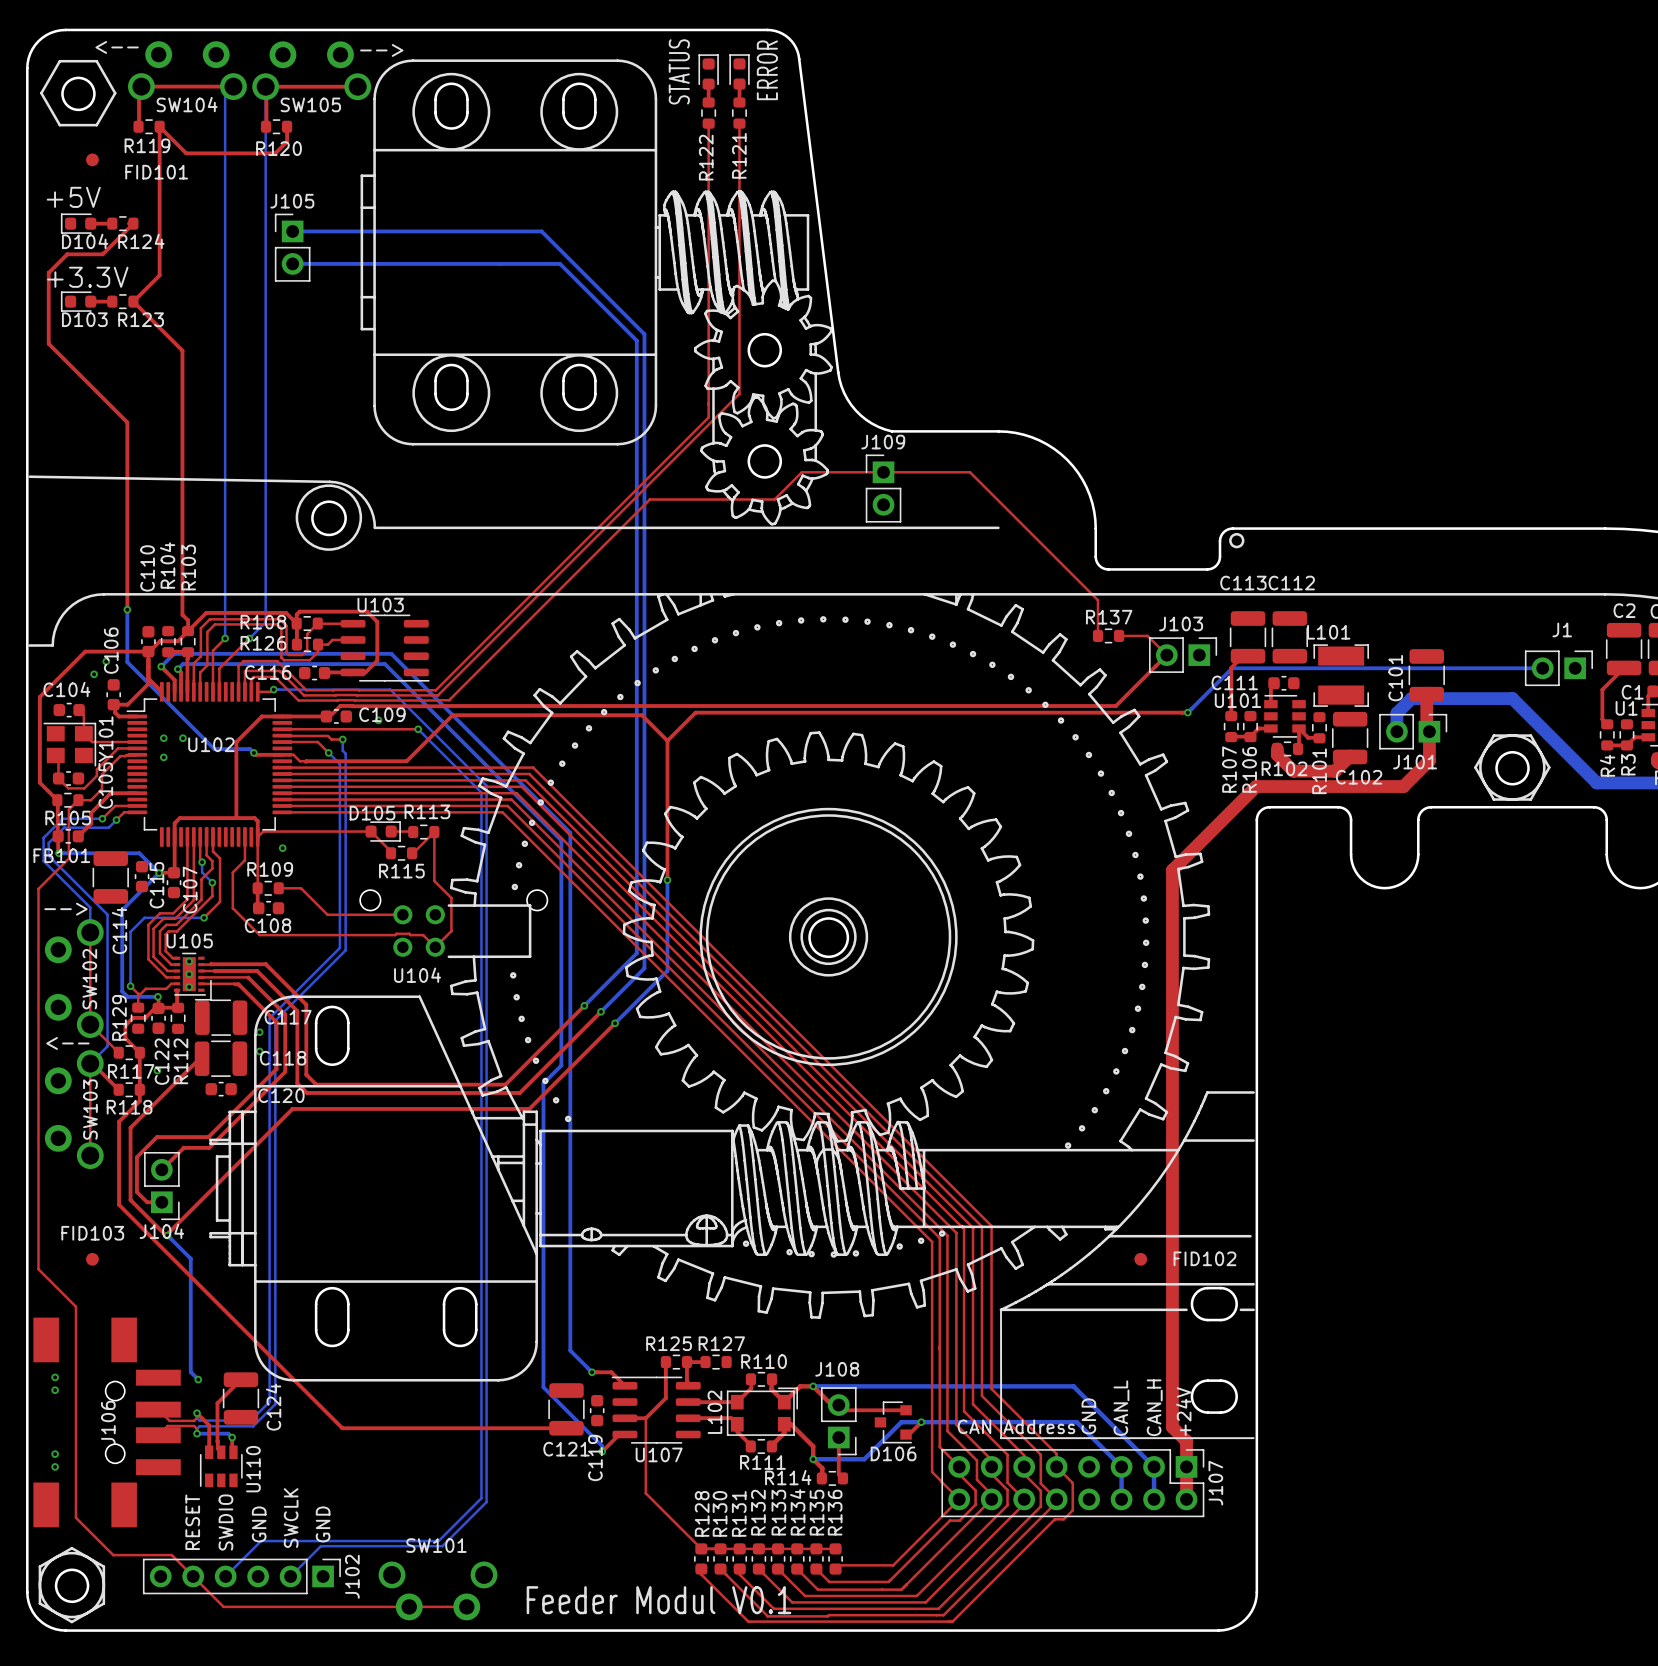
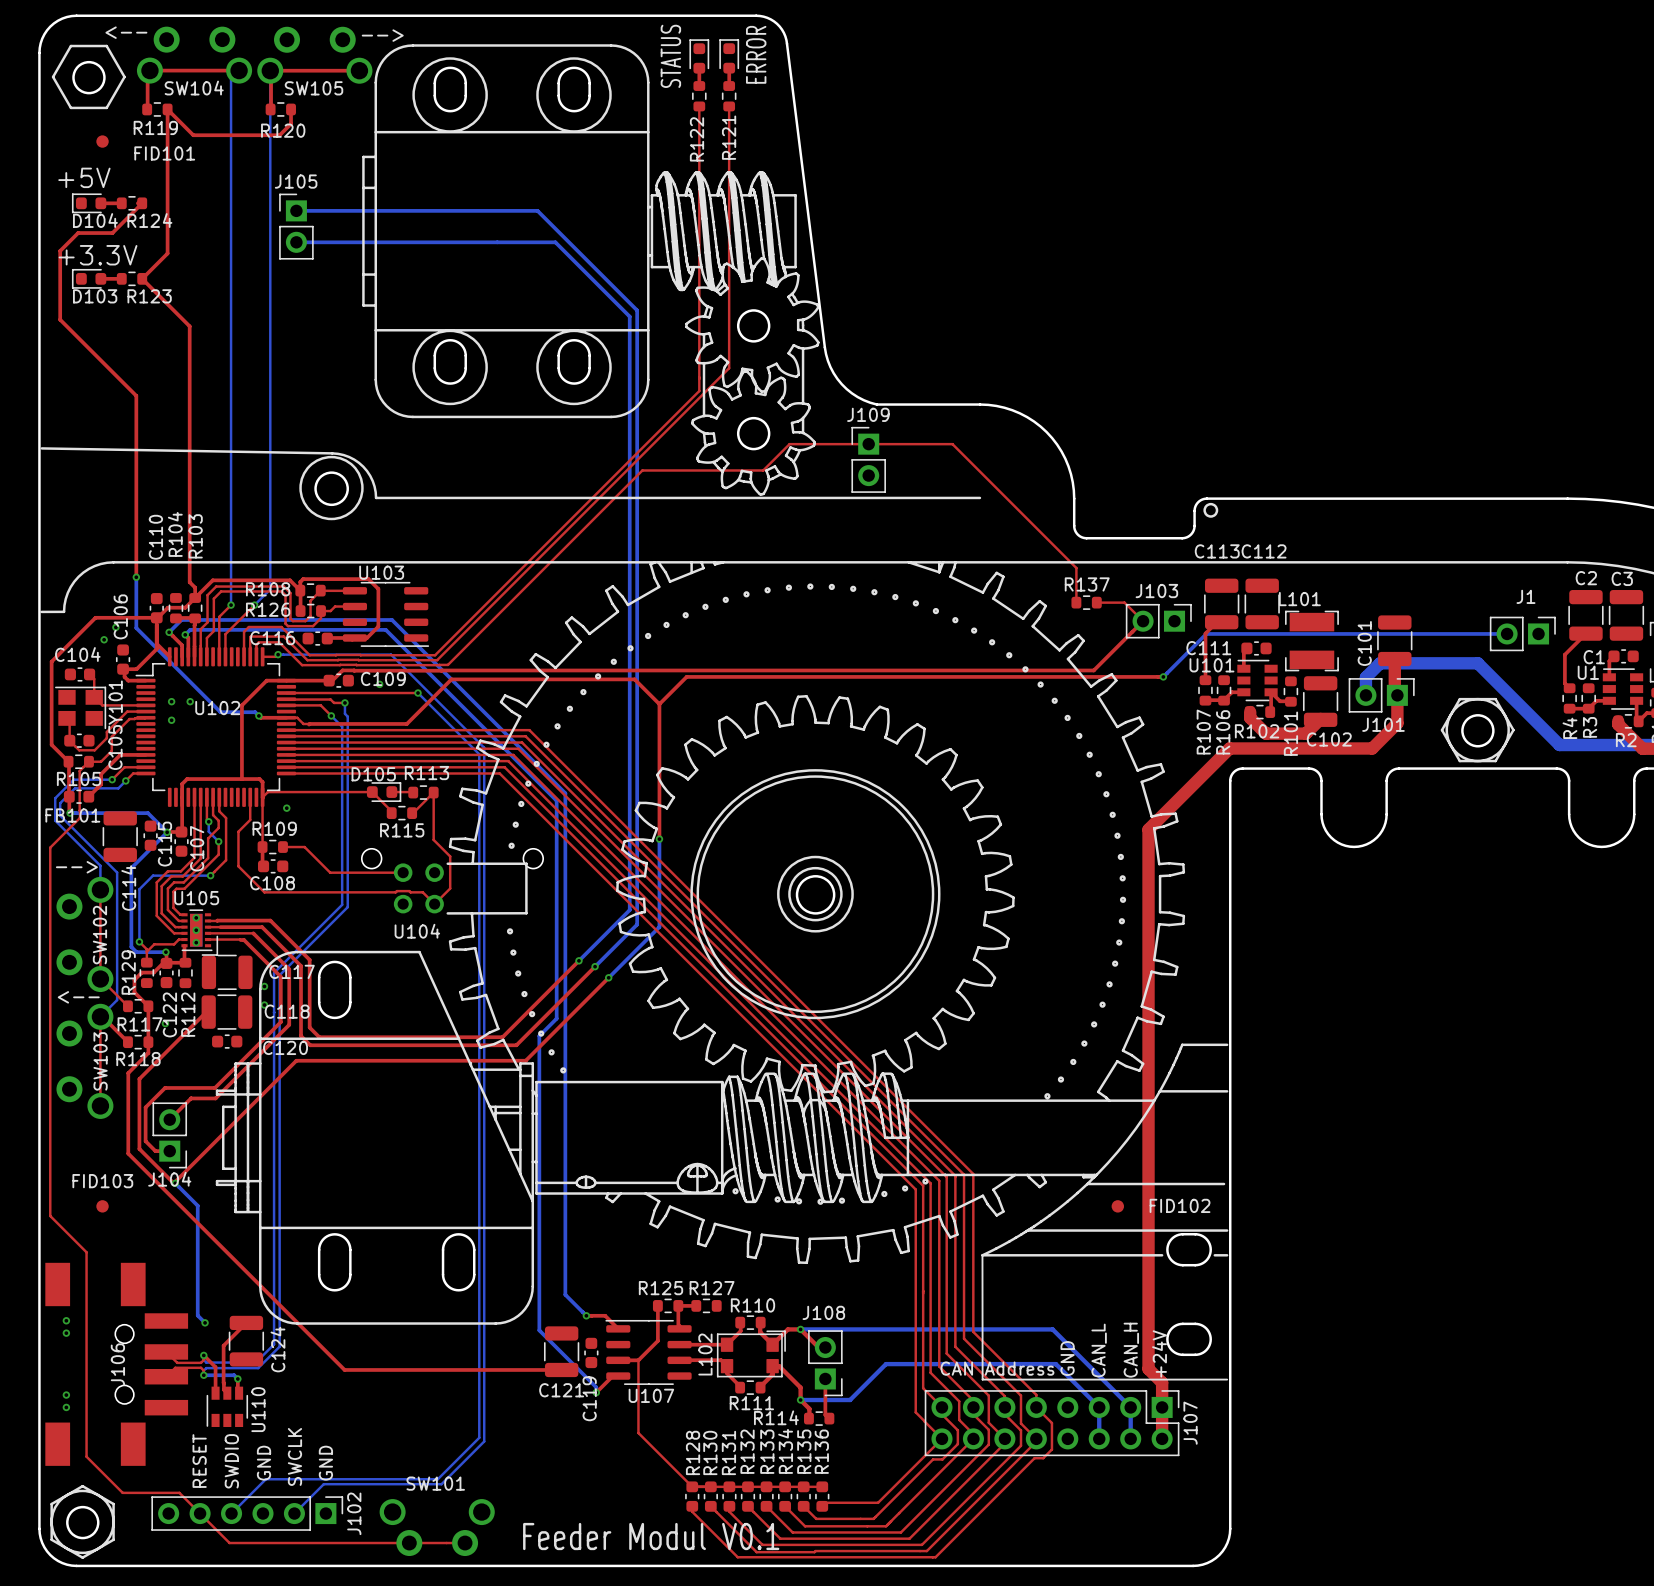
top track: (838, 1405) (844, 1410) (906, 1410) -> none
D106: (893, 1422) -> none
top track: (921, 1422) (908, 1434) (906, 1434) -> none
via: (921, 1422) -> none

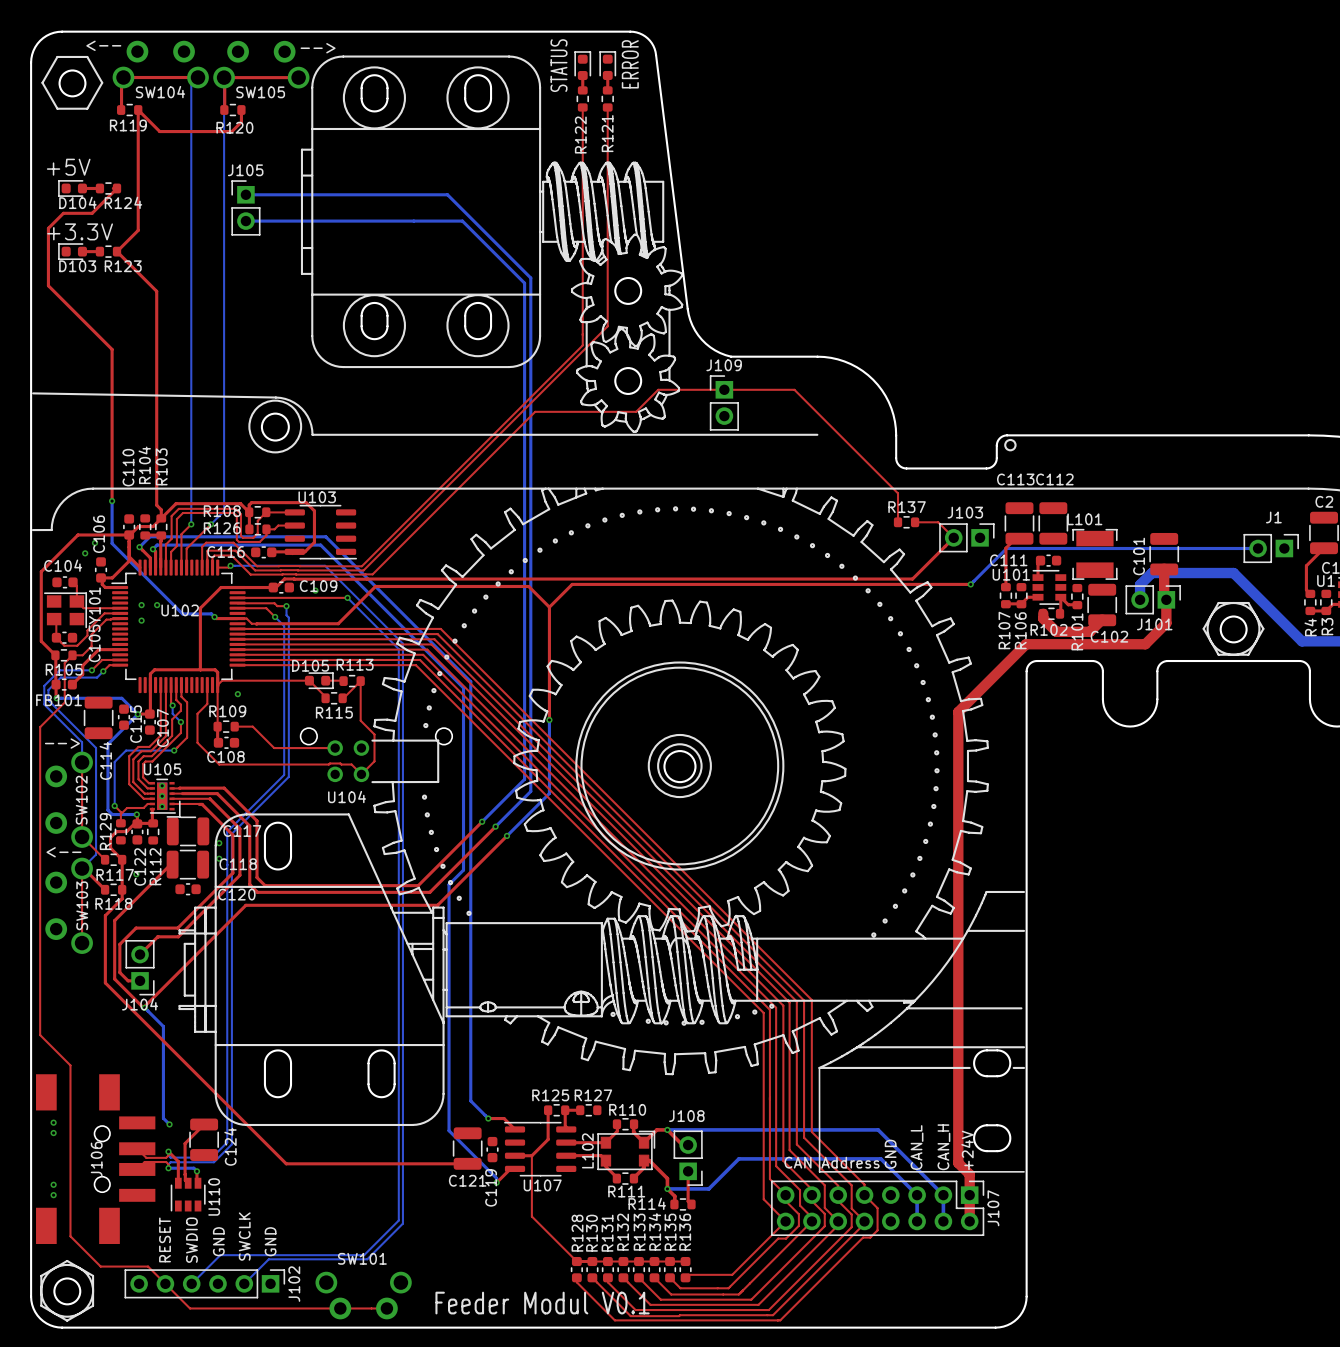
FID101: (102, 141) -> none
FID103: (102, 1206) -> none
FID102: (1117, 1206) -> none

